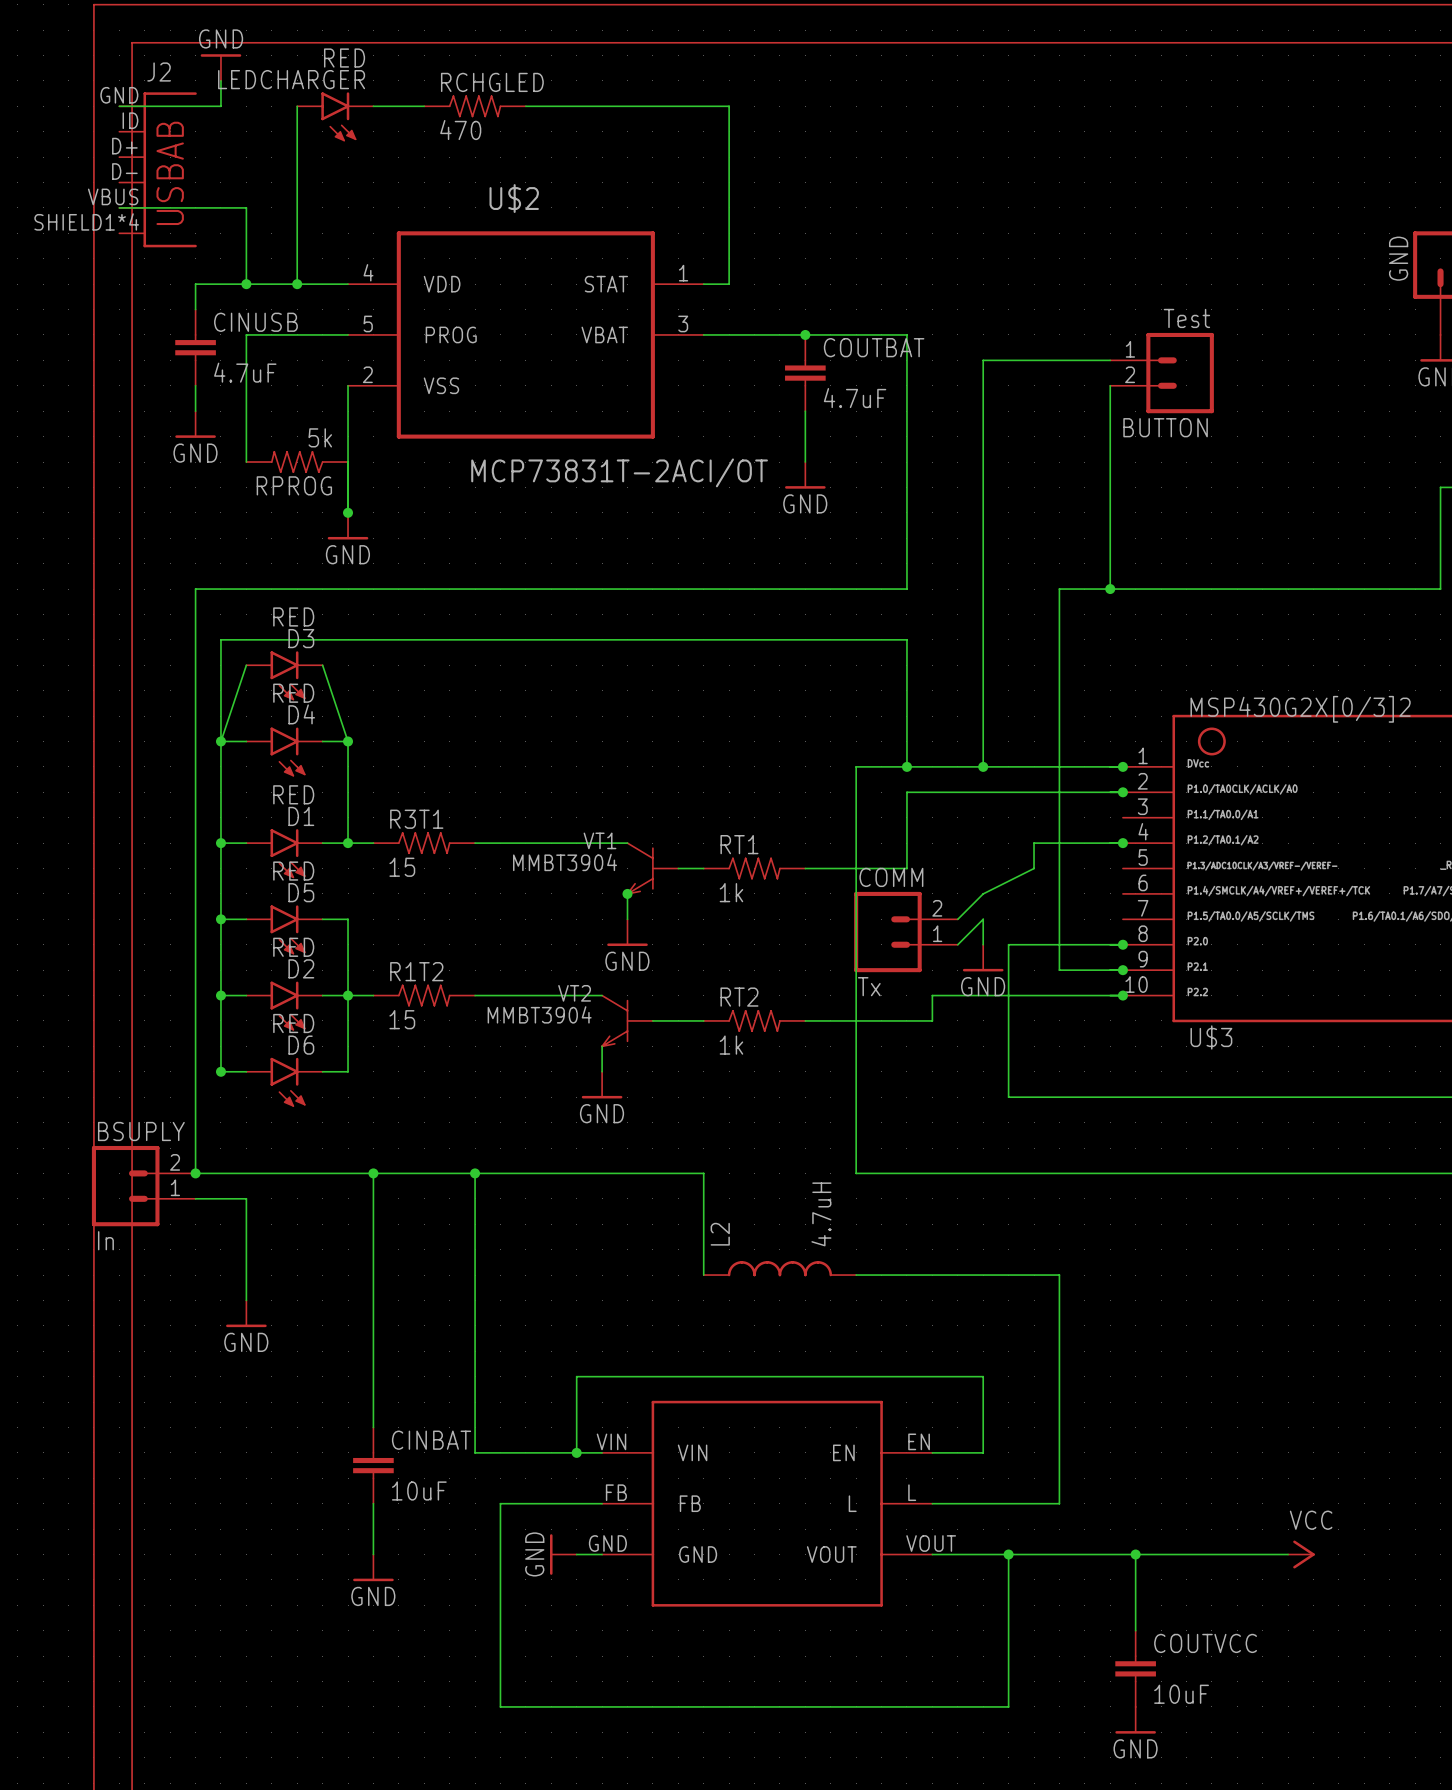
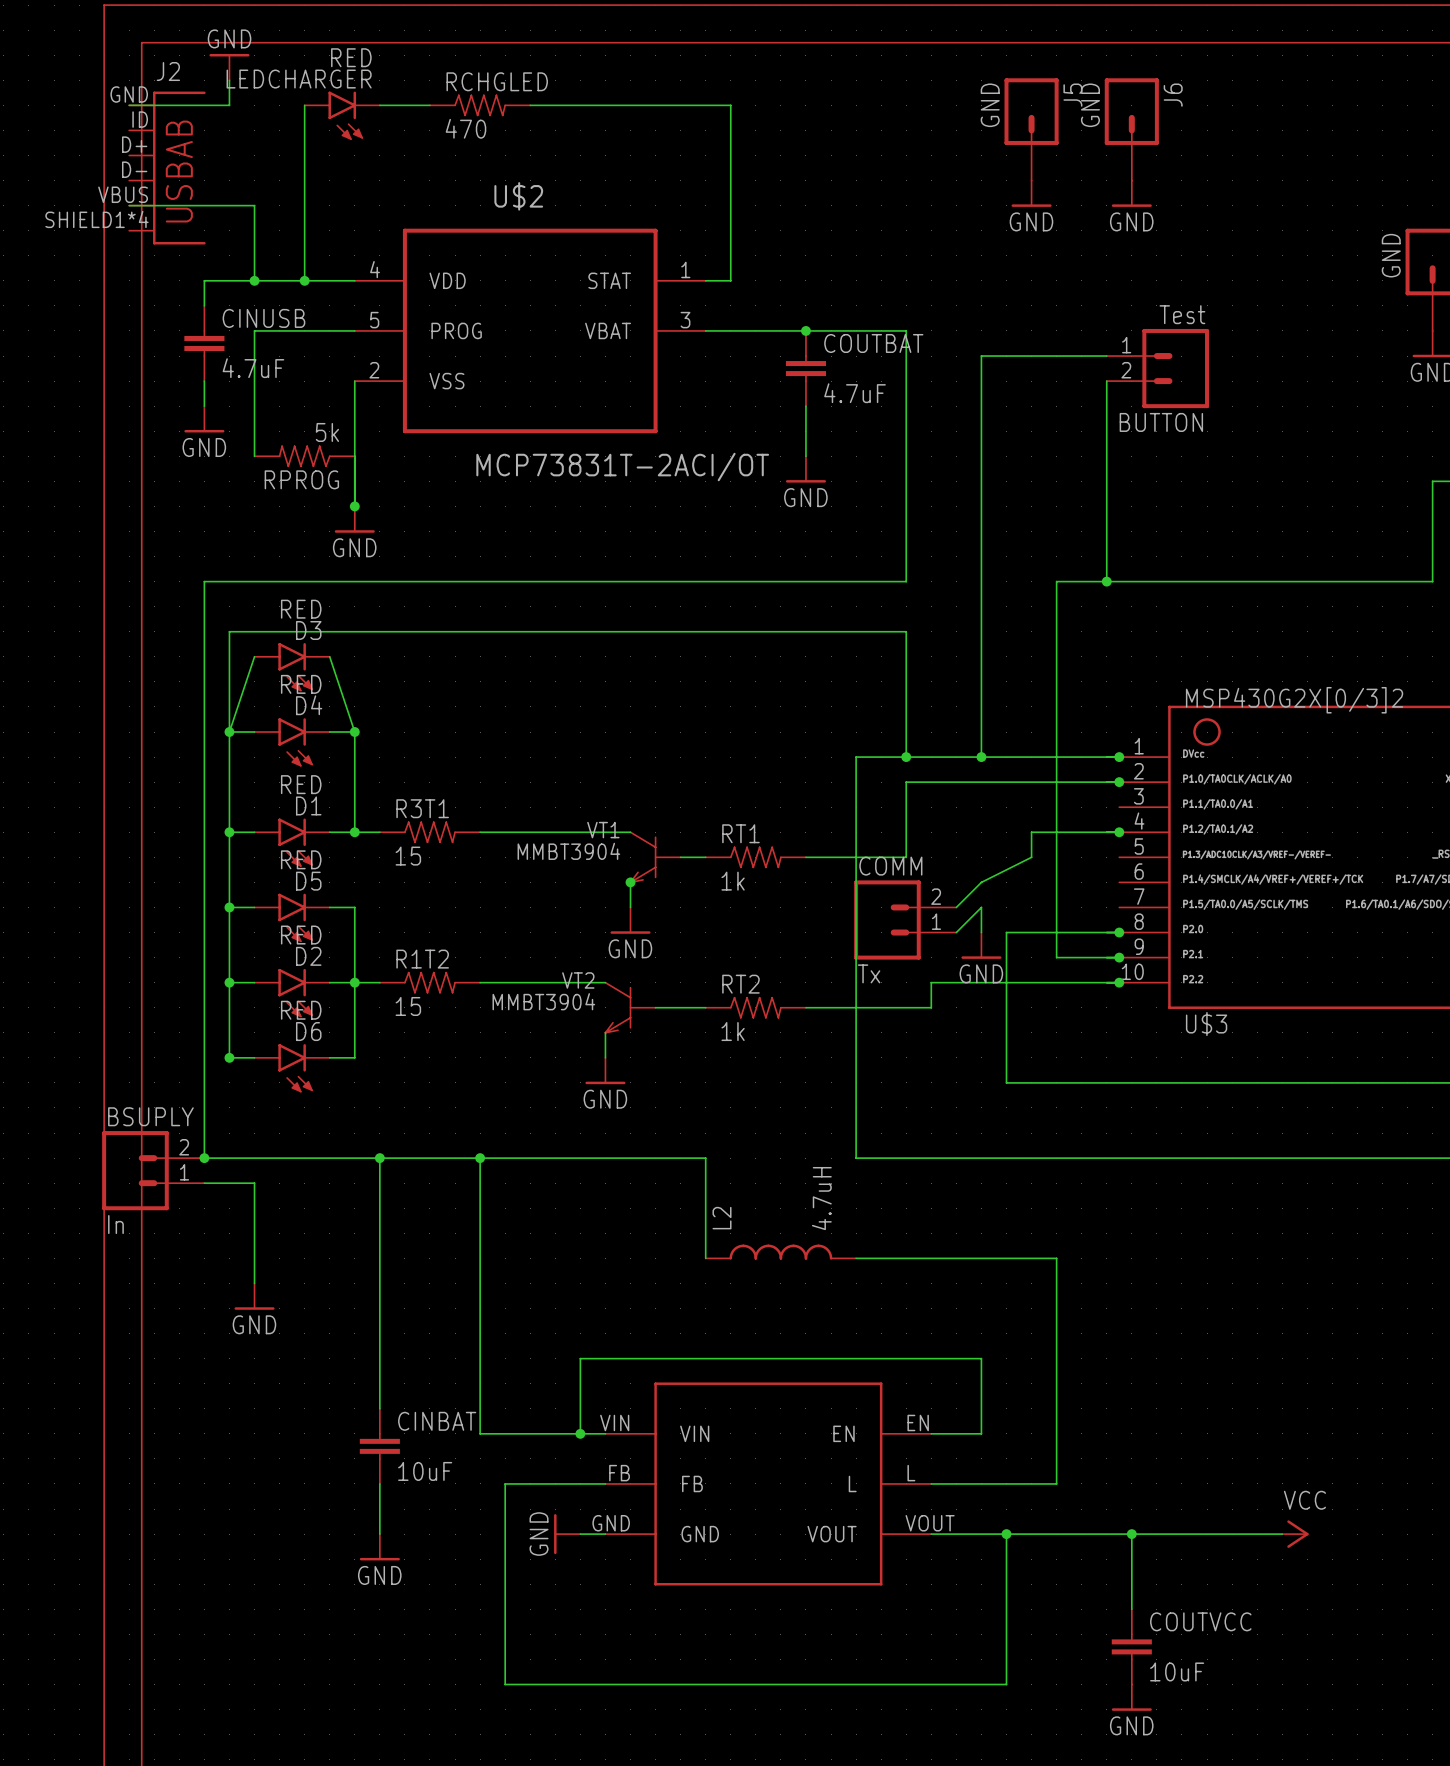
J5: none -> GND (1031, 129)
J6: none -> GND (1131, 129)
power symbol: none -> GND (1031, 193)
power symbol: none -> GND (1131, 193)

